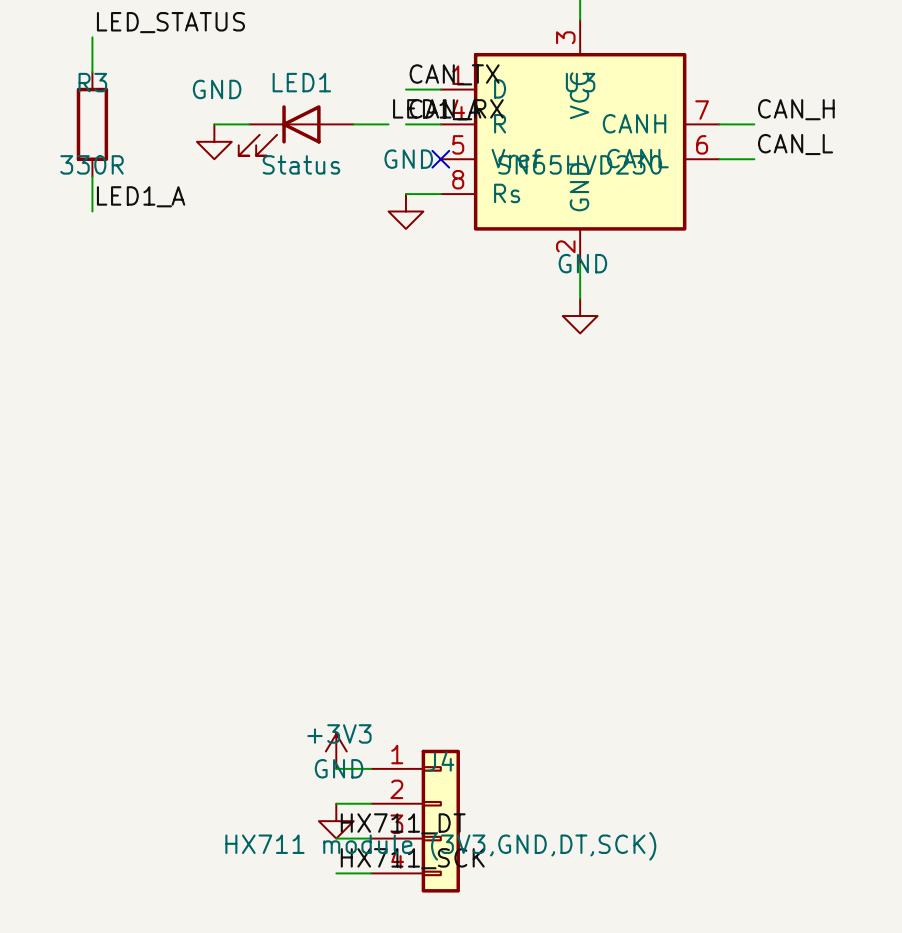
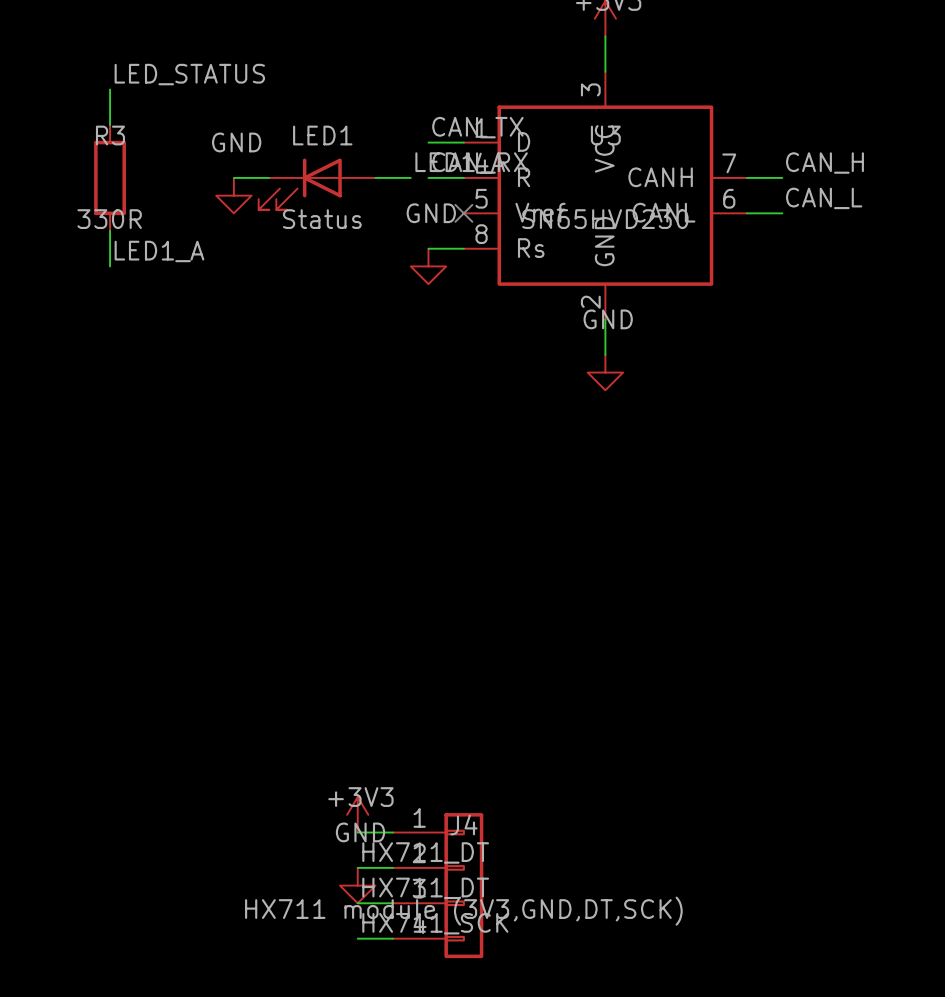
label: none -> HX711_DT (425, 852)

